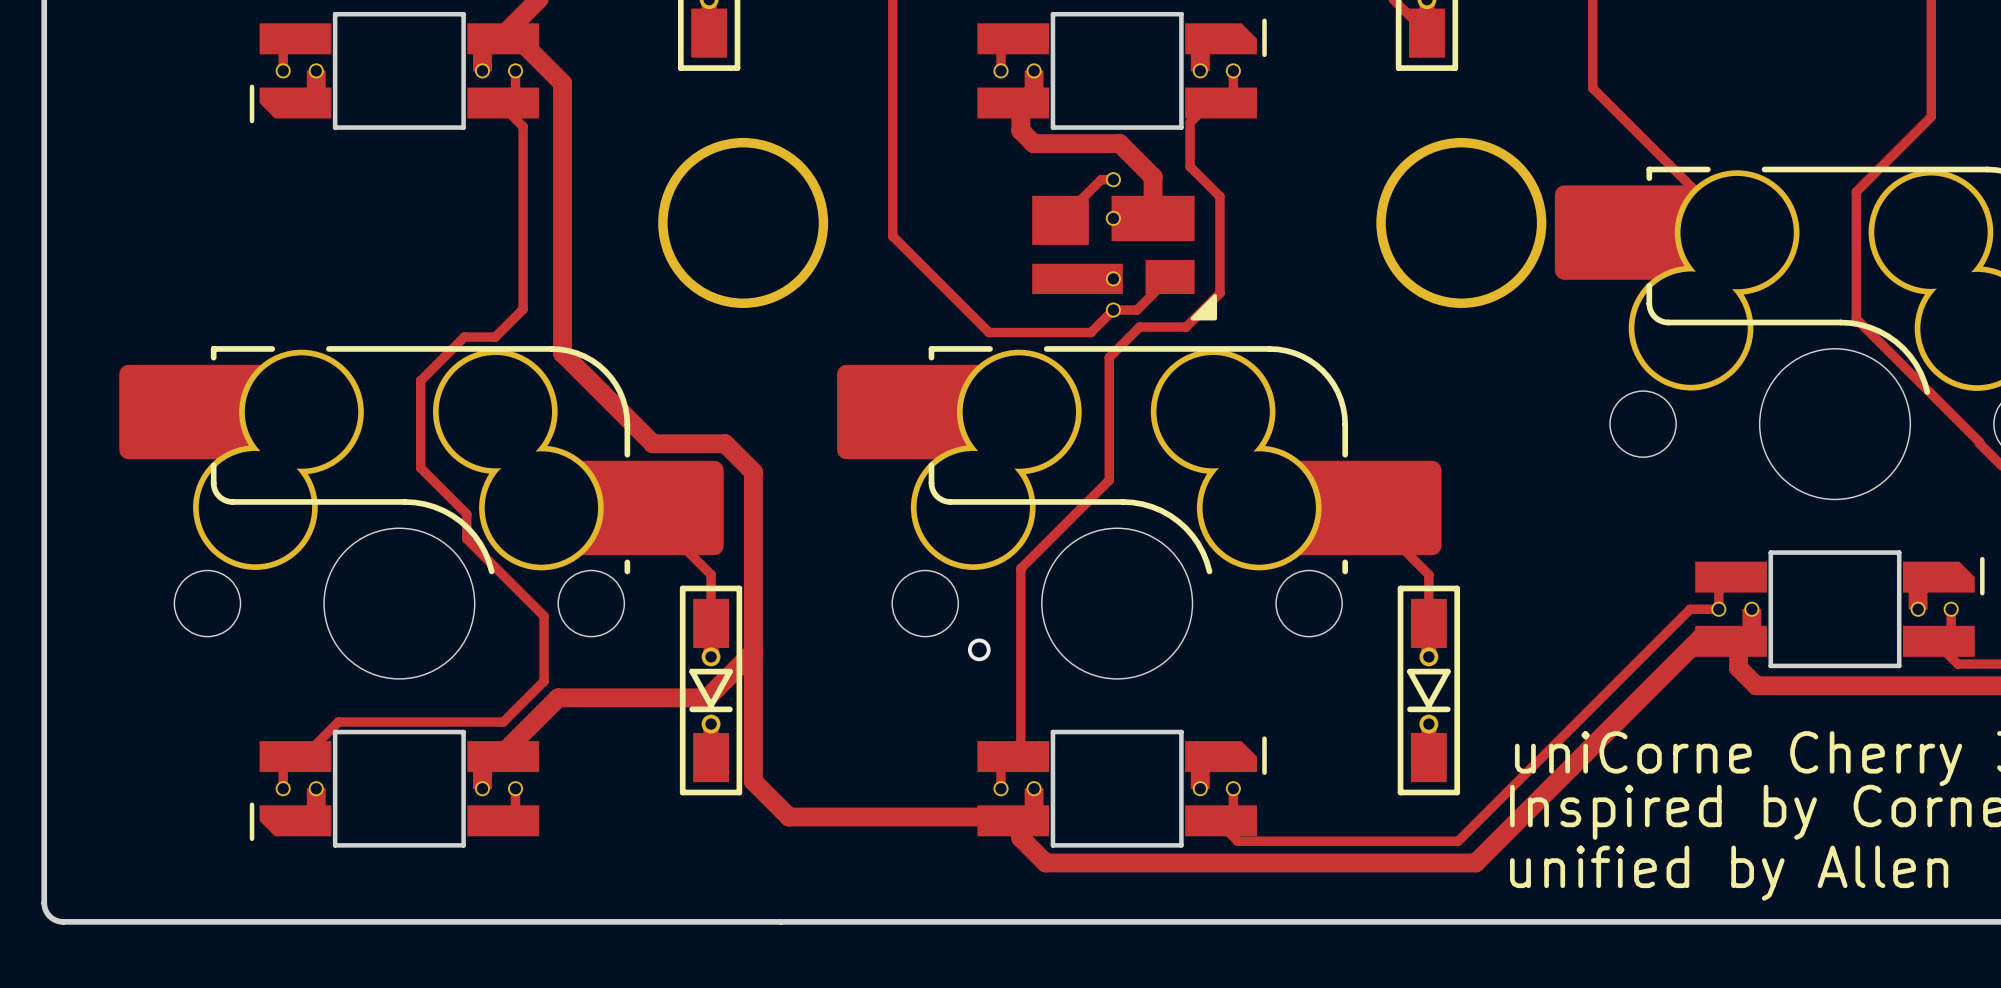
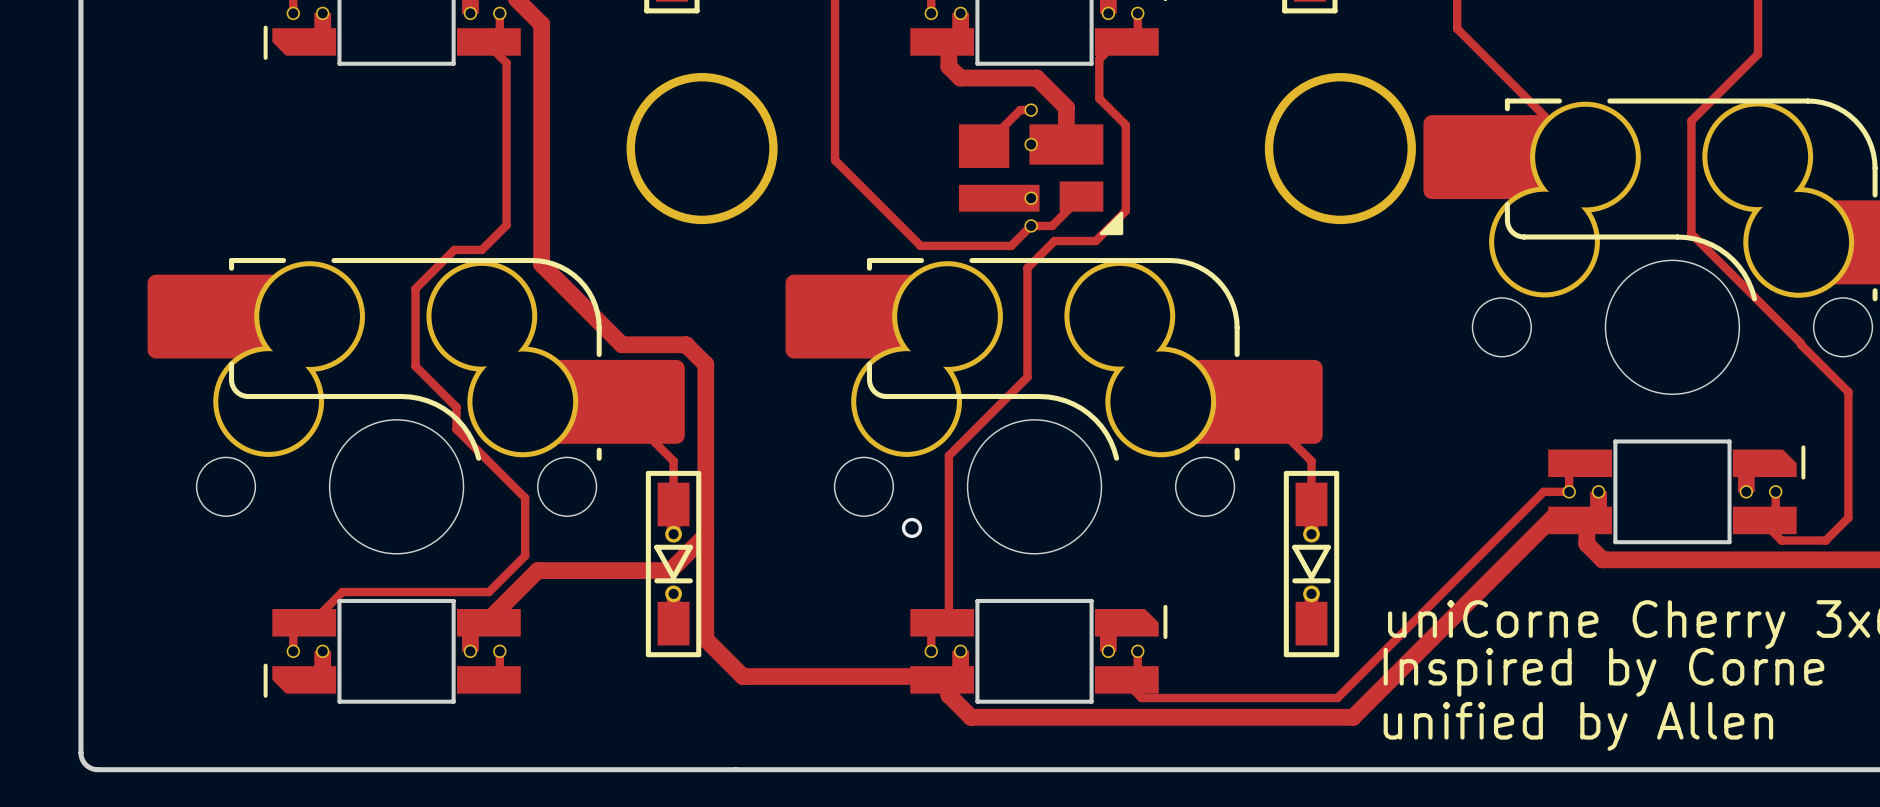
track: (747, 465) (753, 471) (753, 651) (747, 658) -> (705, 364) (705, 639) (711, 644)
track: (752, 652) (753, 781) -> none

